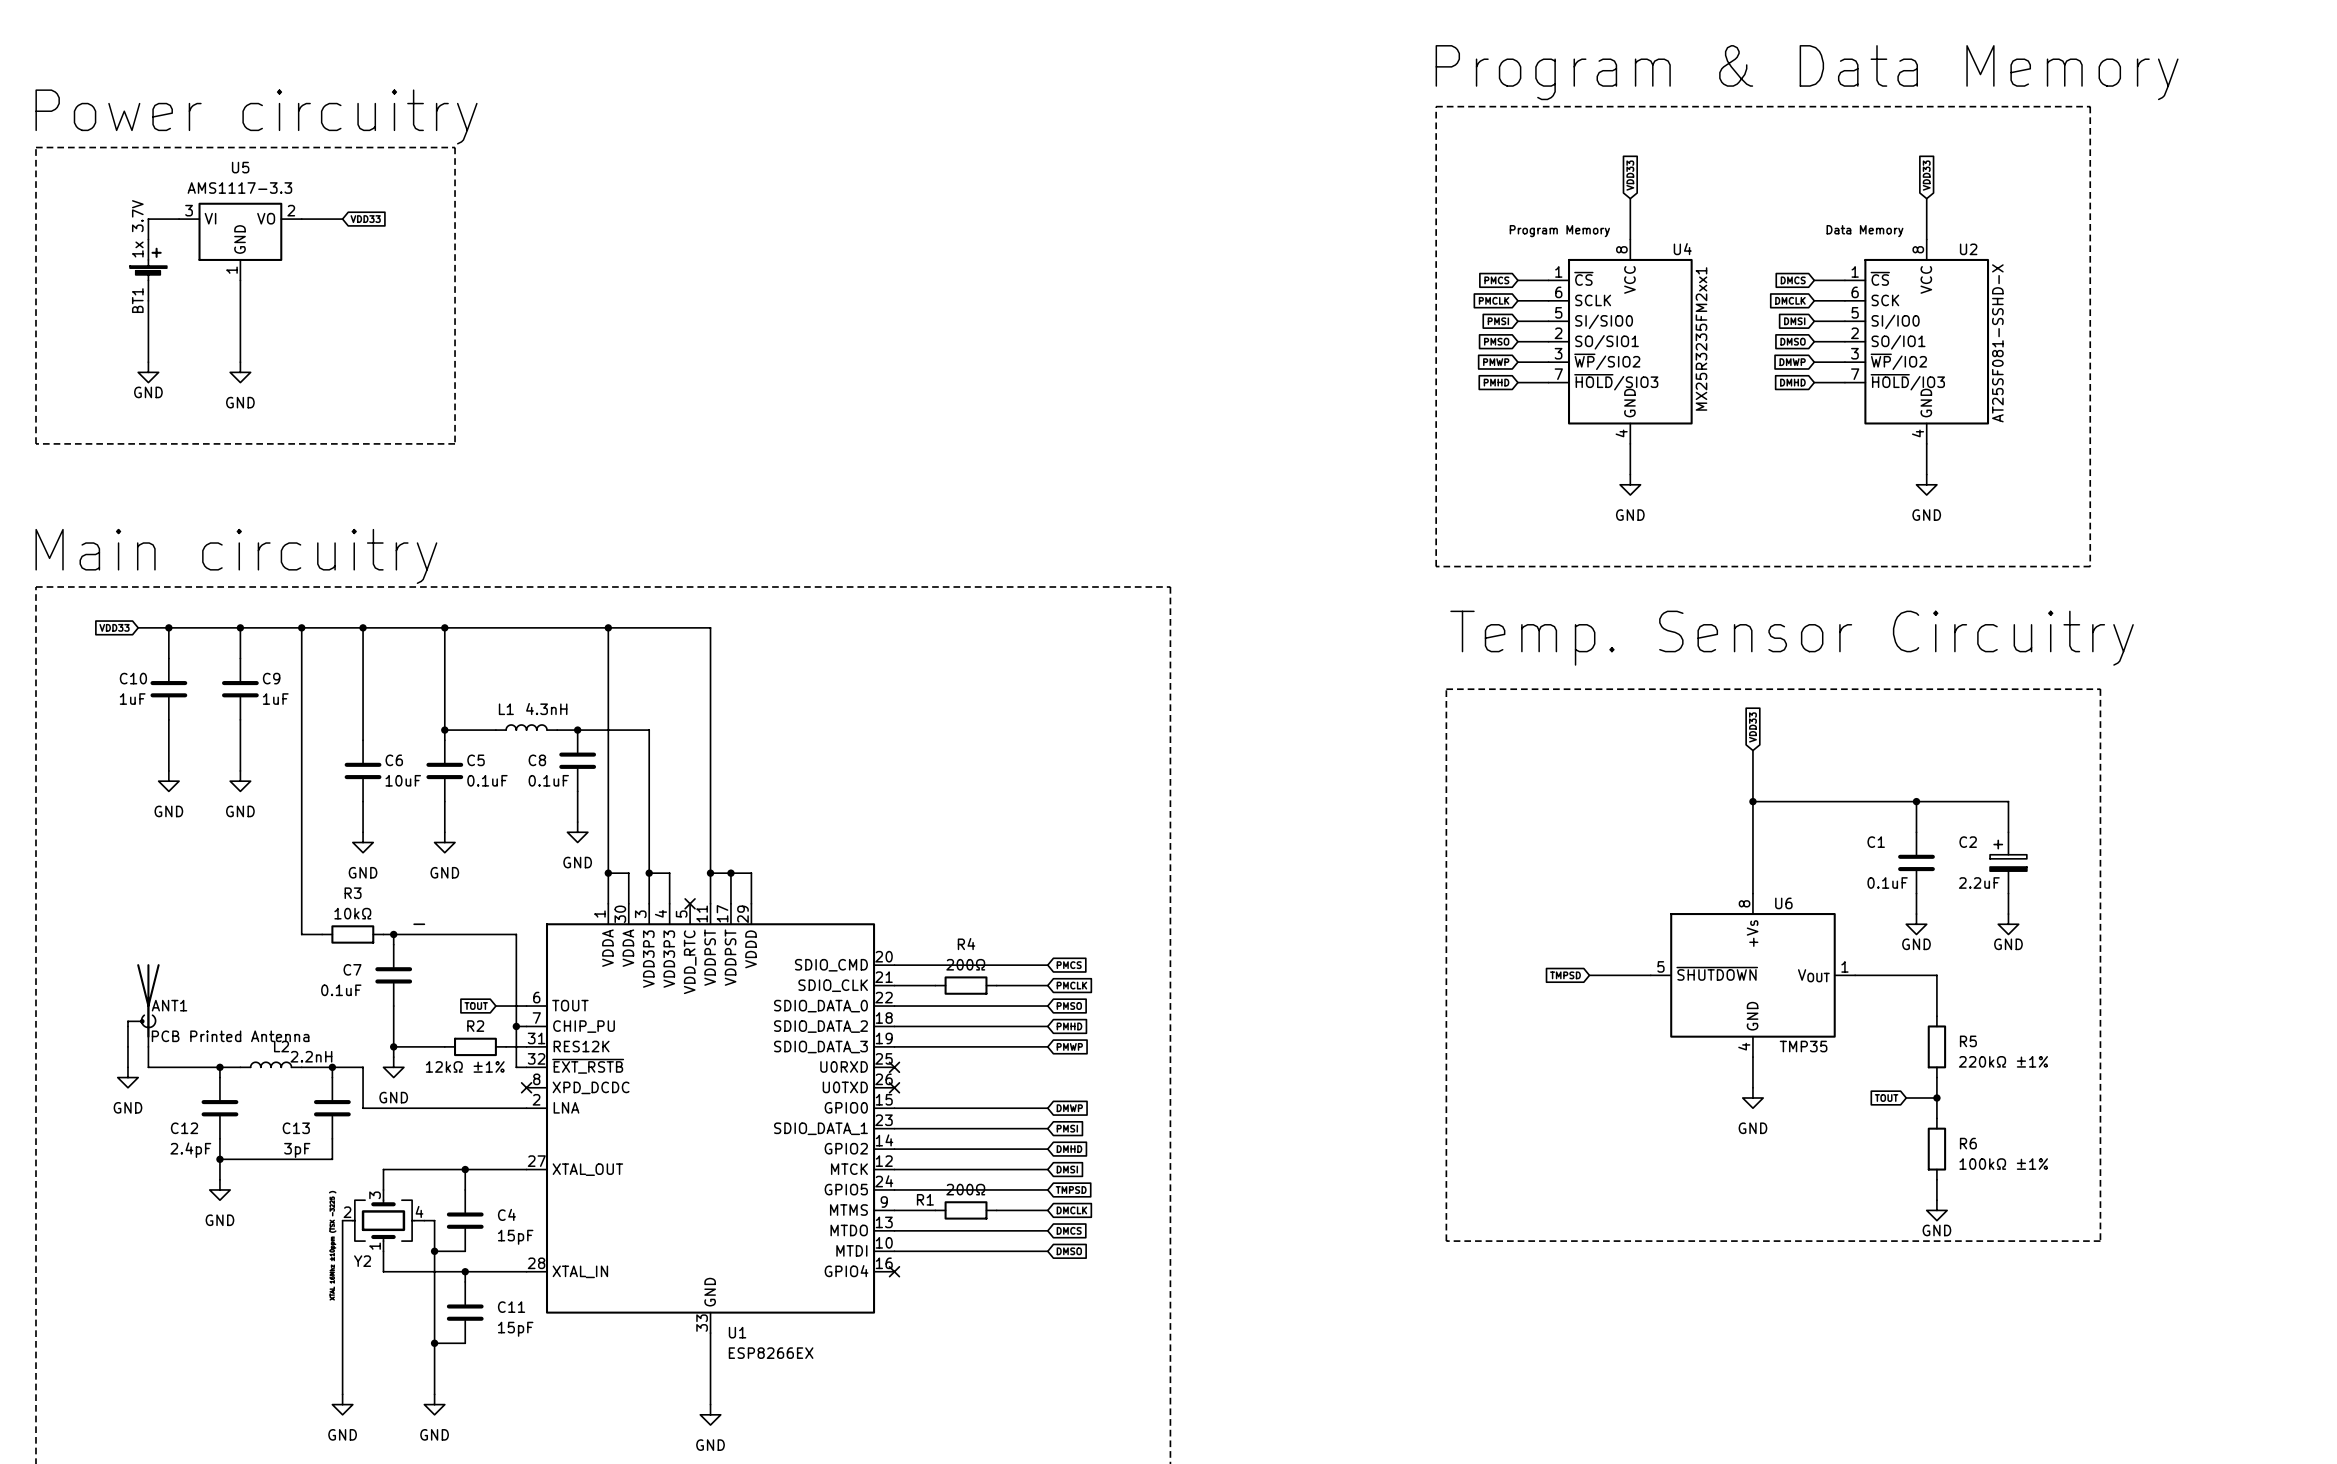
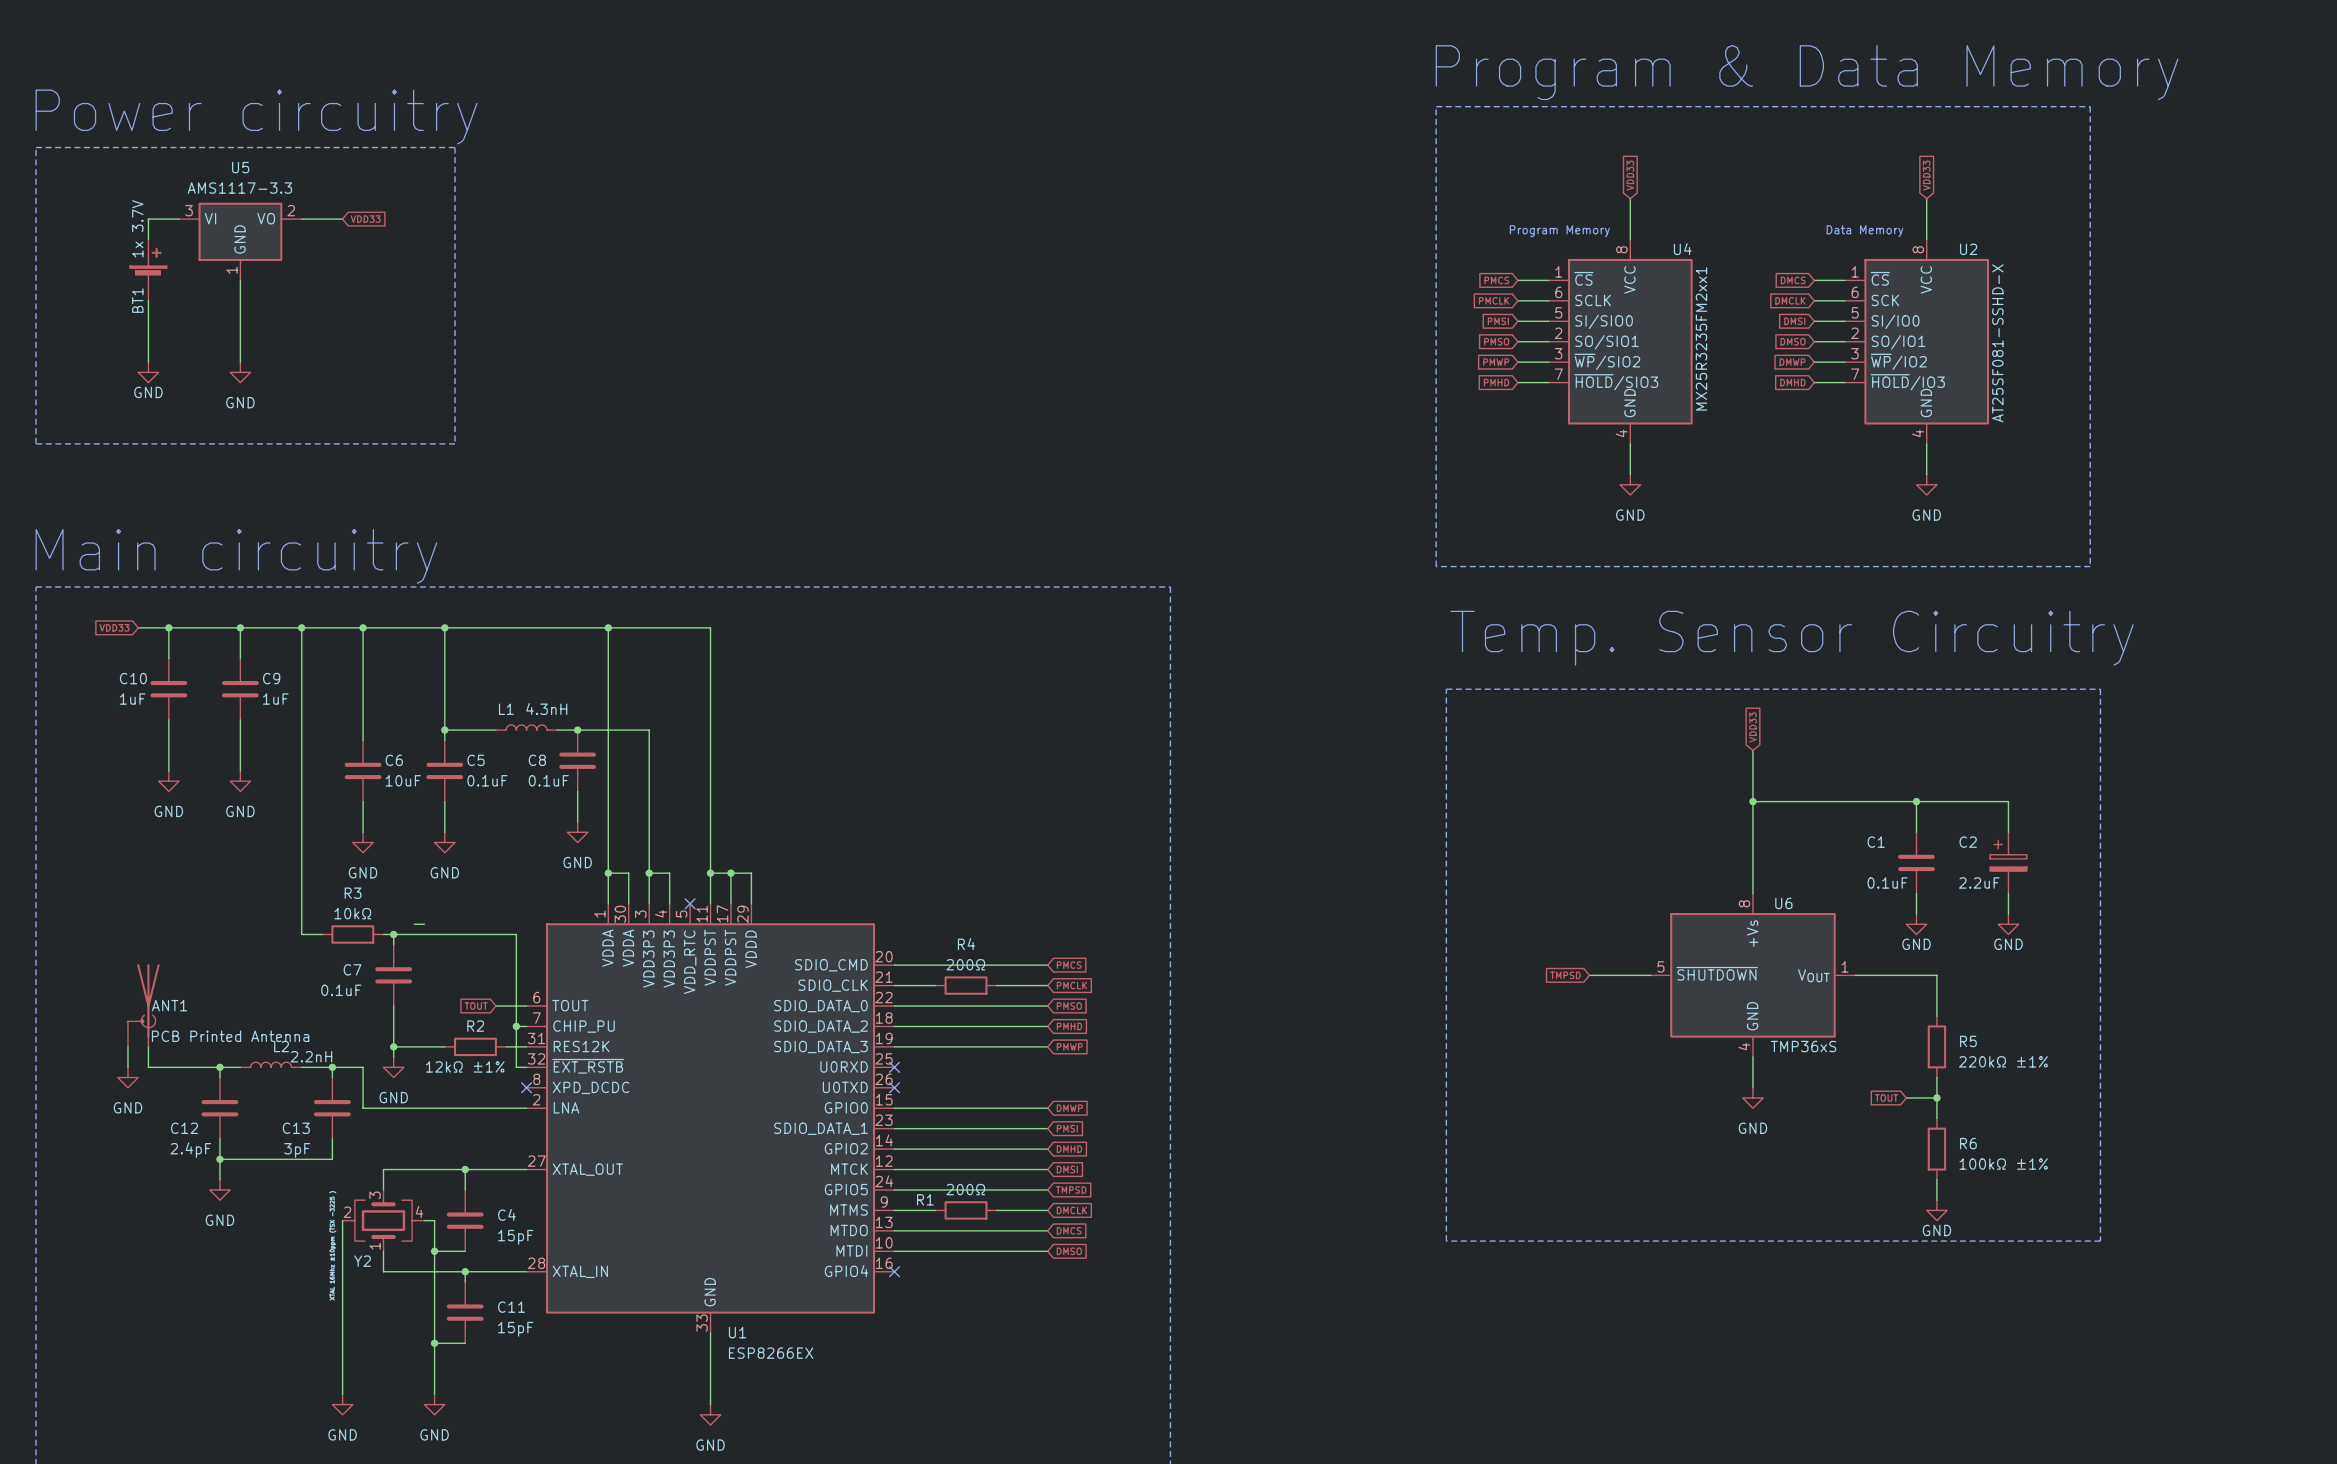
U6 value: TMP35 (1803, 1046) -> TMP36xS (1803, 1046)

